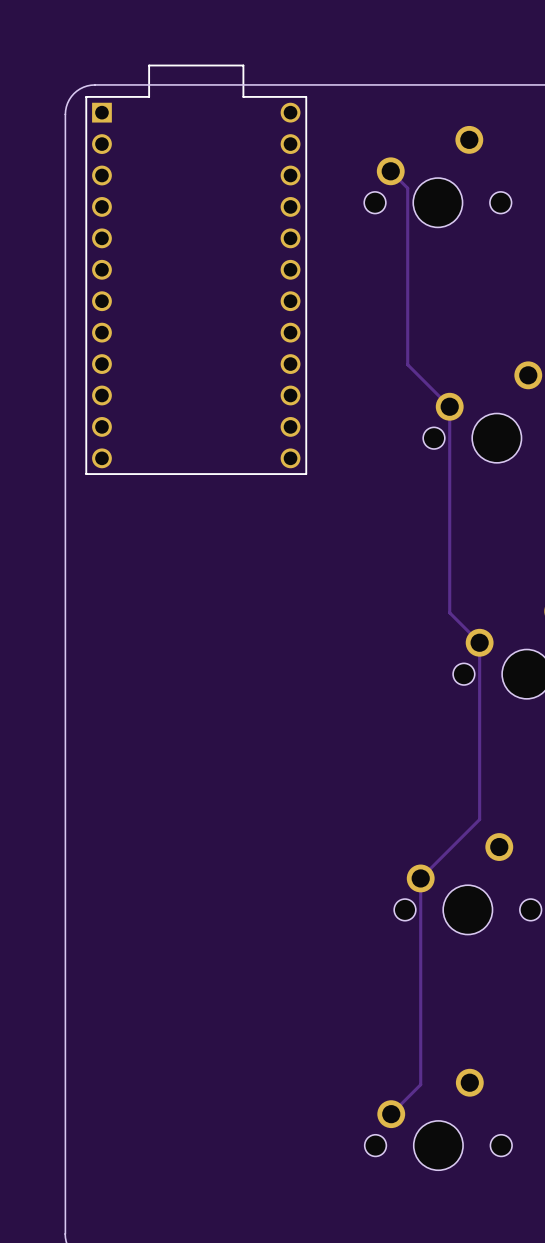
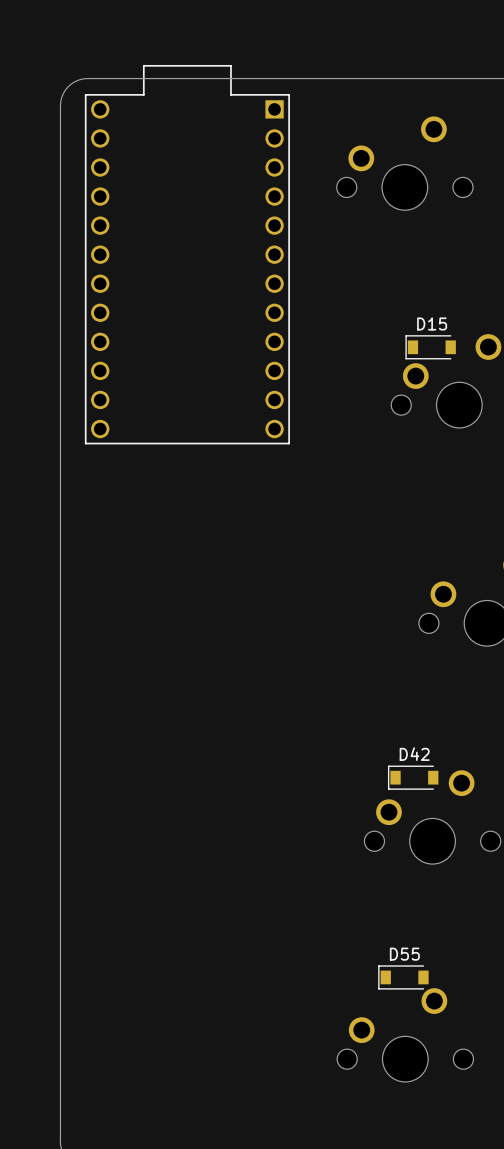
track: (390, 171) (407, 188) (407, 364) (449, 406) (449, 612) (479, 642) (479, 819) (420, 878) (420, 1084) (391, 1114) -> none
part side: top (196, 269) -> bottom (187, 254)
D15: none -> (430, 347)
D42: none -> (413, 777)
D55: none -> (403, 977)

